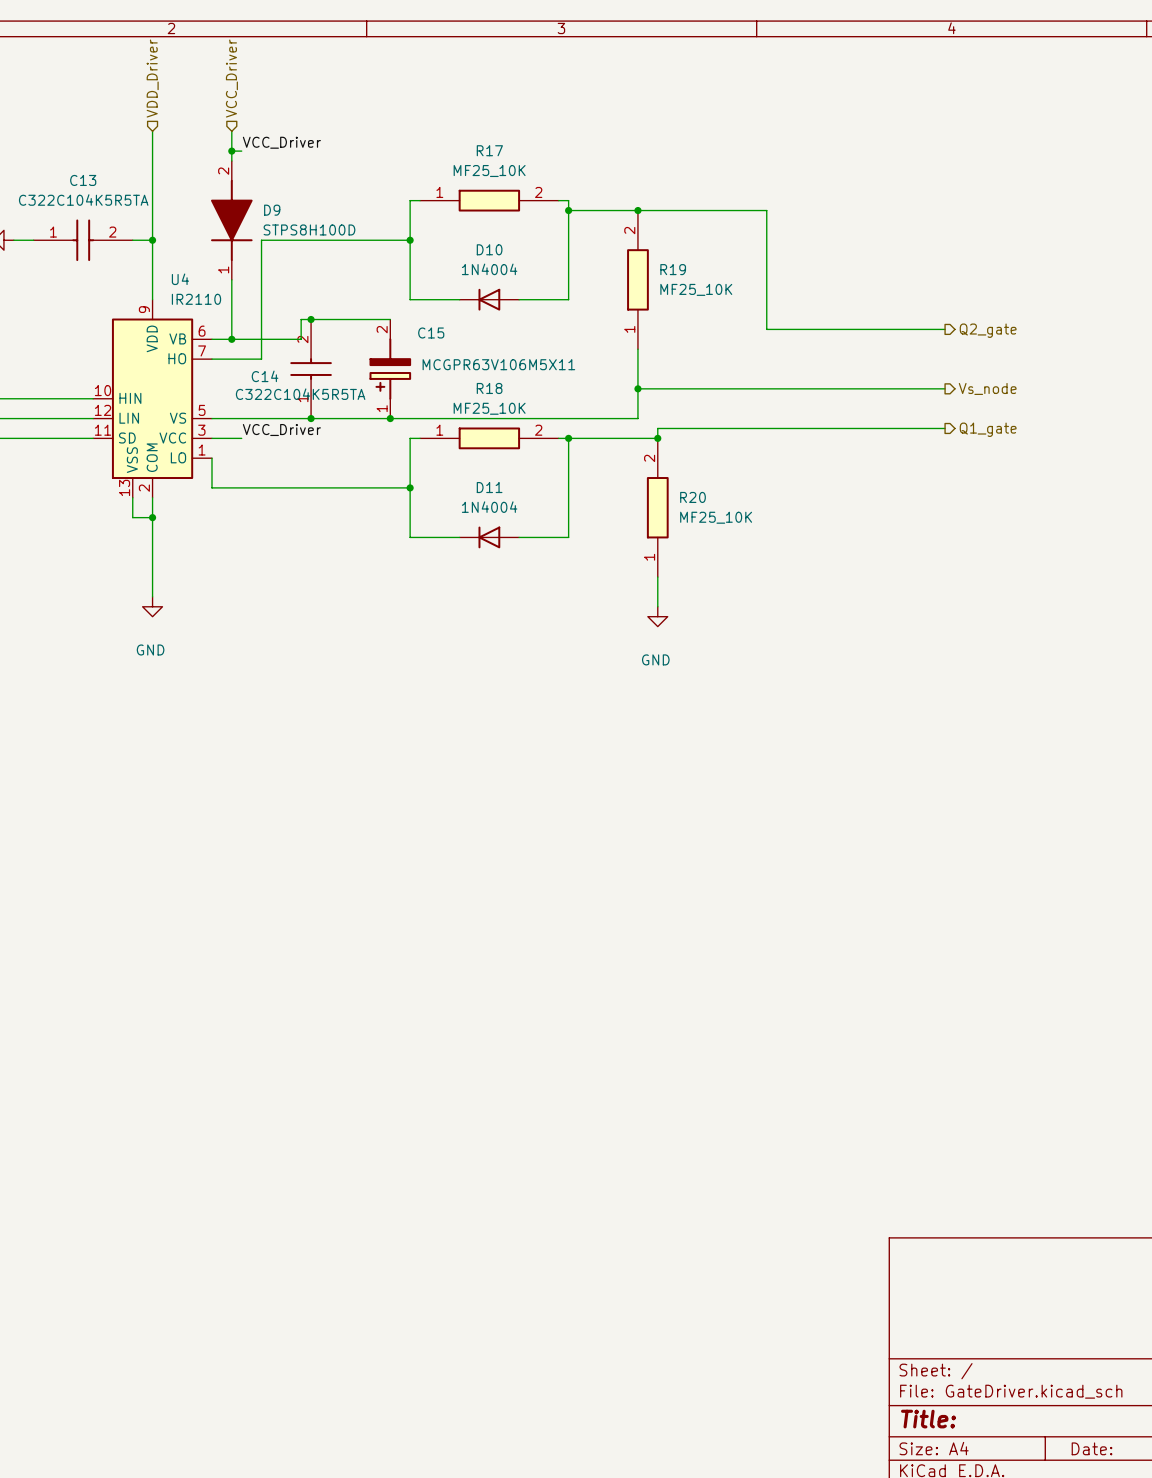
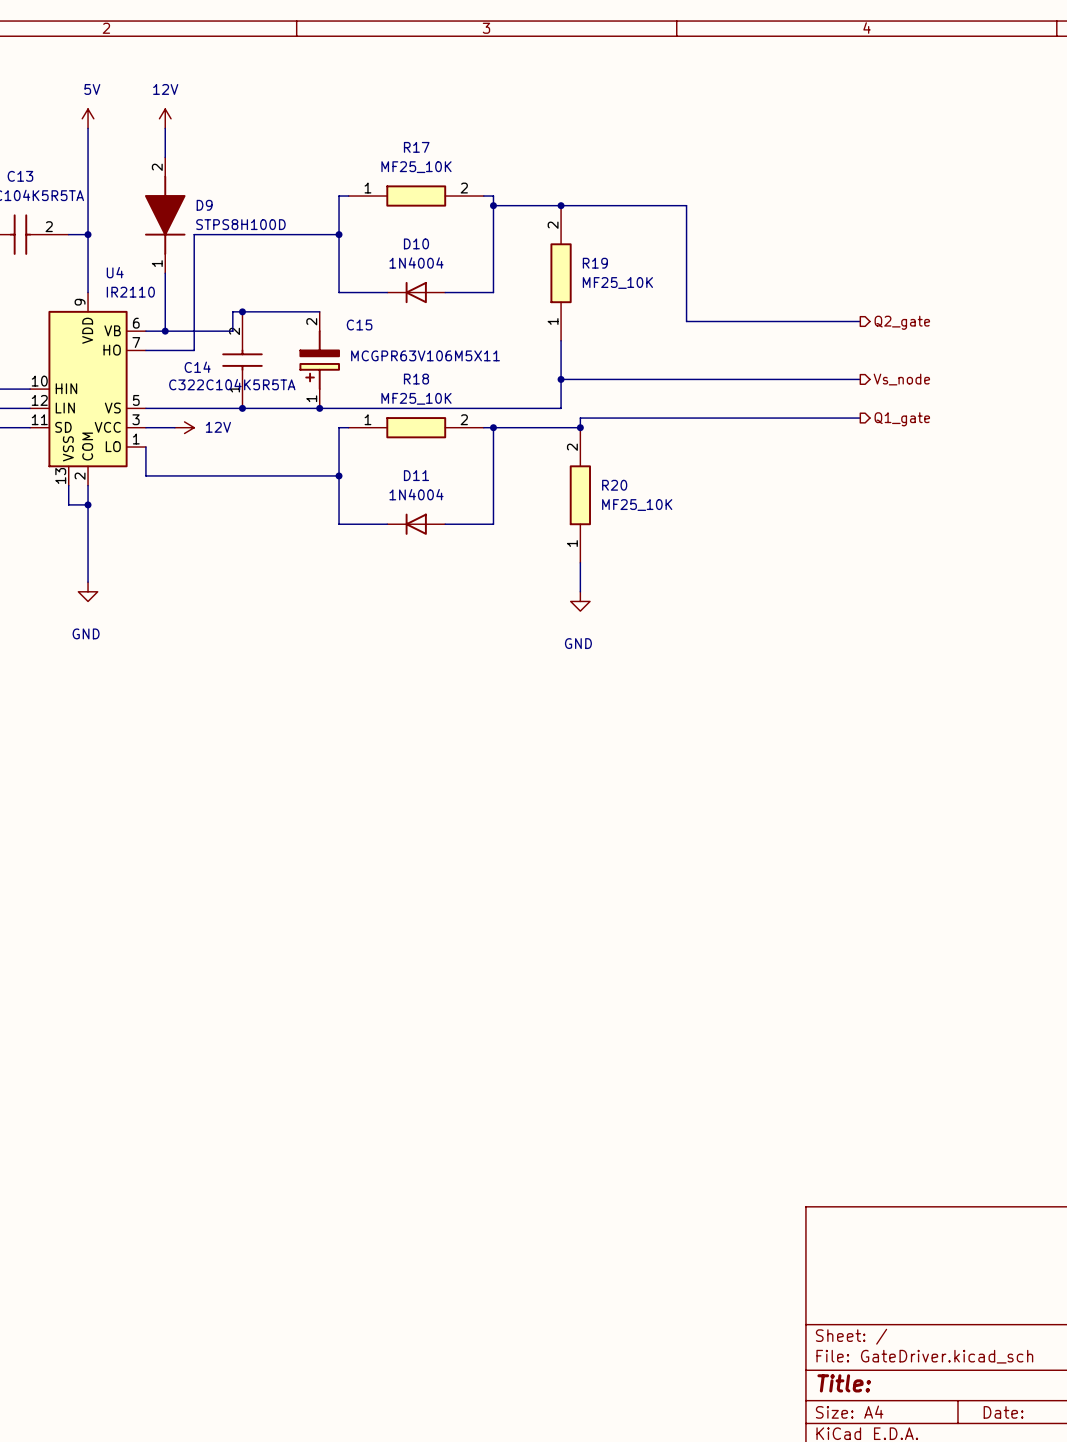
hierarchical label: VDD_Driver (152, 78) -> none
hierarchical label: VCC_Driver (231, 78) -> none
power symbol: none -> 5V (88, 118)
power symbol: none -> 12V (165, 118)
label: VCC_Driver (281, 142) -> none
wire: (231, 151) (241, 151) -> none
junction: (231, 151) -> none
label: VCC_Driver (281, 430) -> none
power symbol: none -> 12V (184, 427)

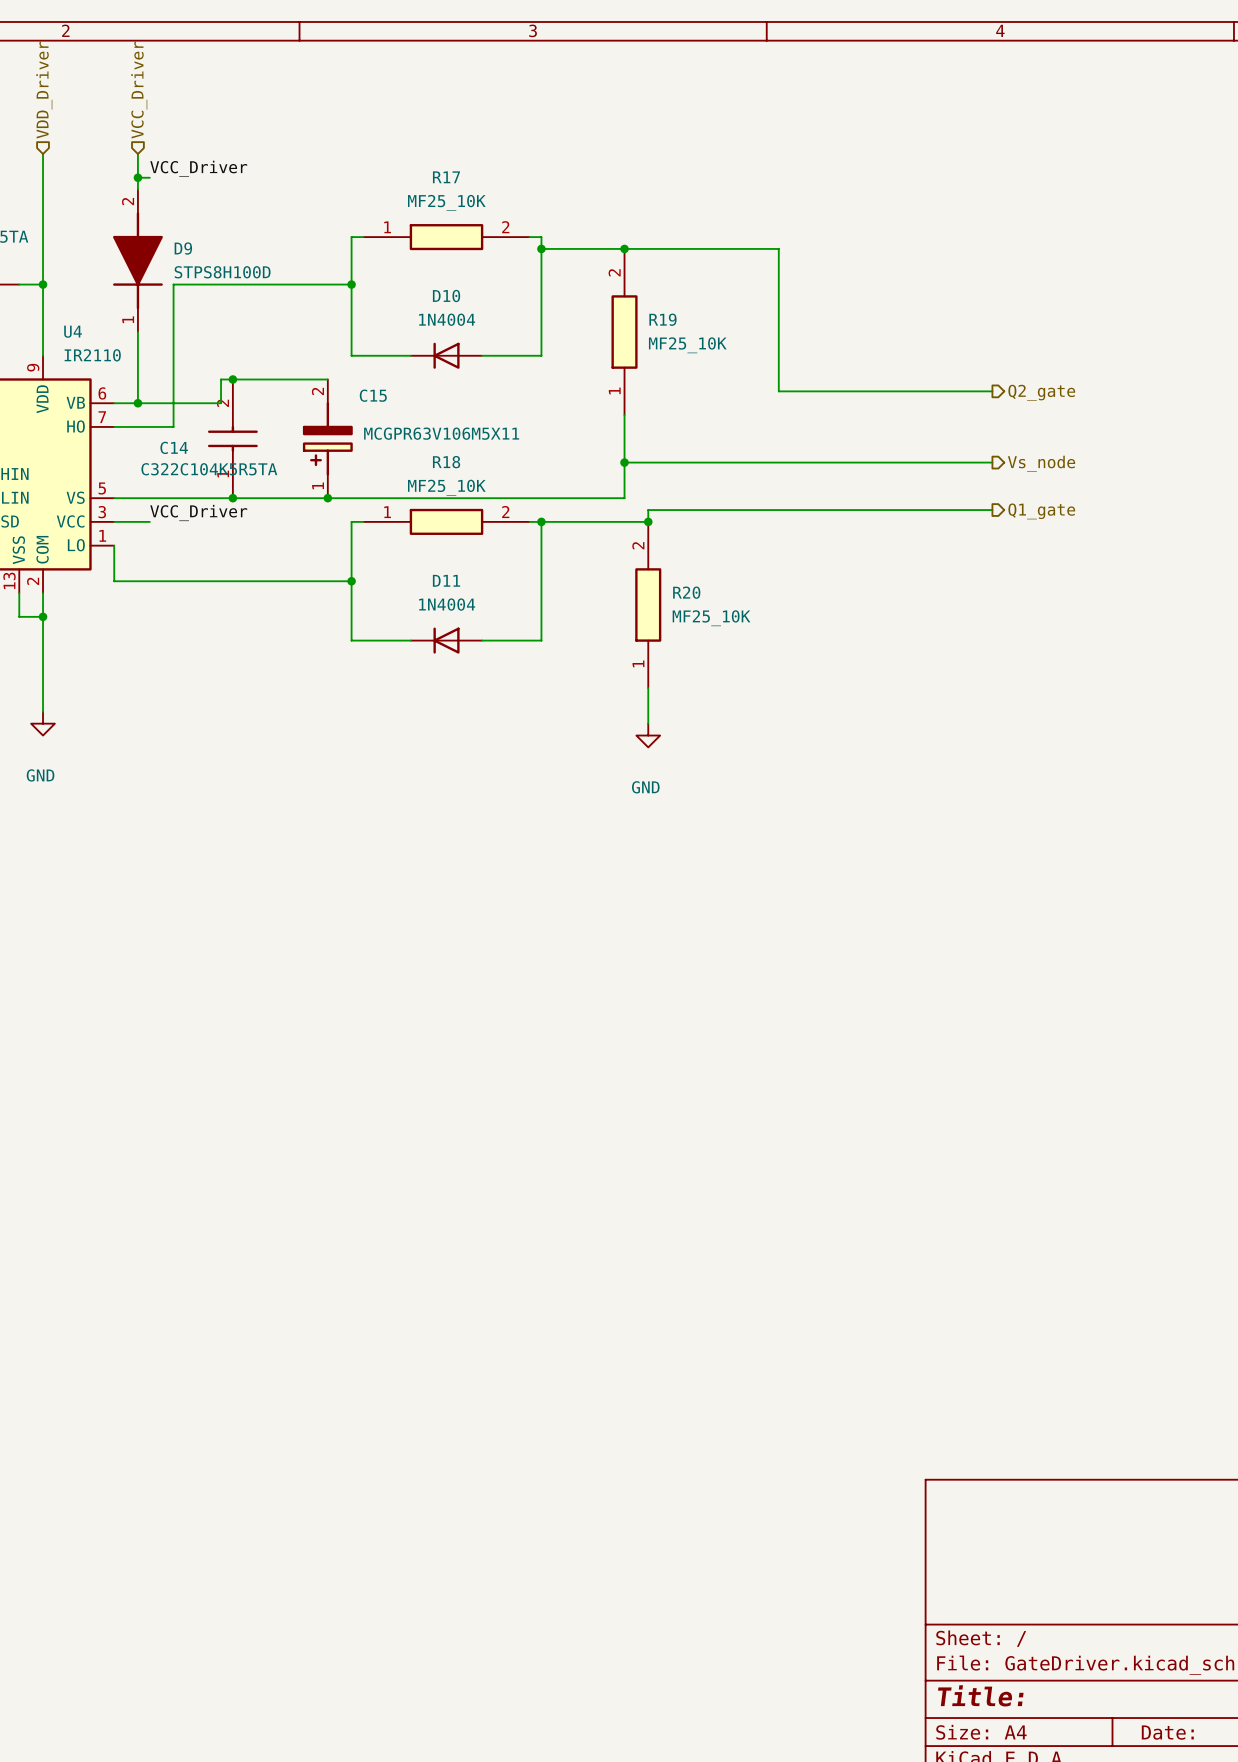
hierarchical label: none -> VDD_Driver (44, 90)
hierarchical label: none -> VCC_Driver (139, 90)
power symbol: 5V (88, 118) -> none
power symbol: 12V (165, 118) -> none
label: none -> VCC_Driver (198, 168)
wire: none -> (137, 177) (149, 177)
junction: none -> (137, 177)
label: none -> VCC_Driver (198, 512)
power symbol: 12V (184, 427) -> none

